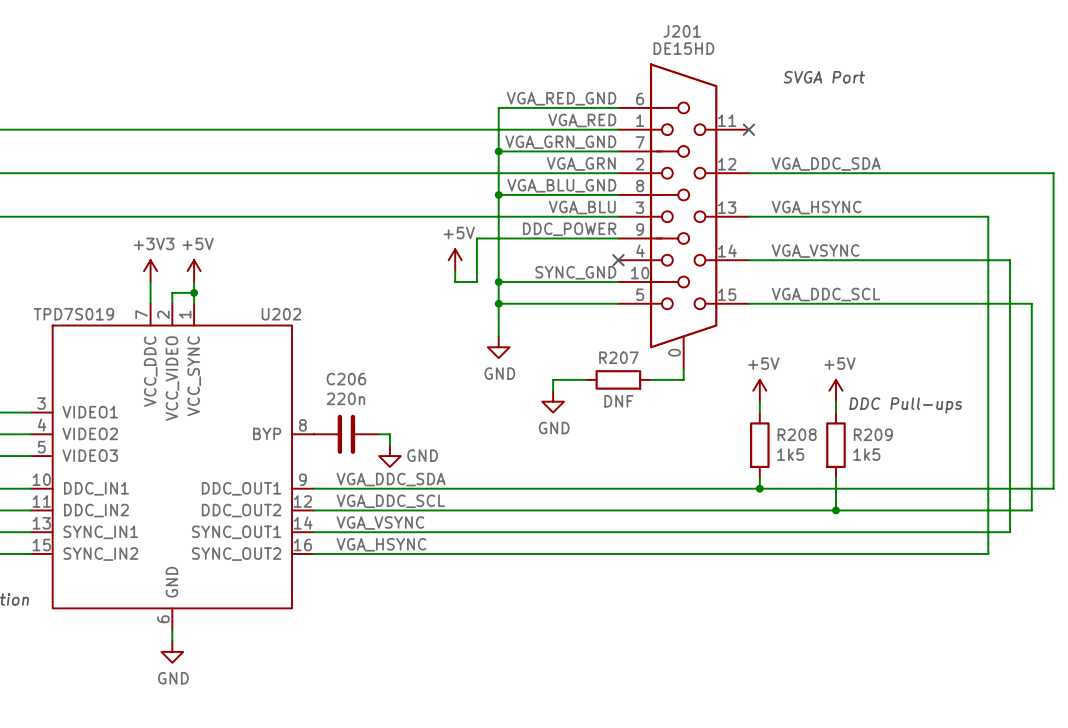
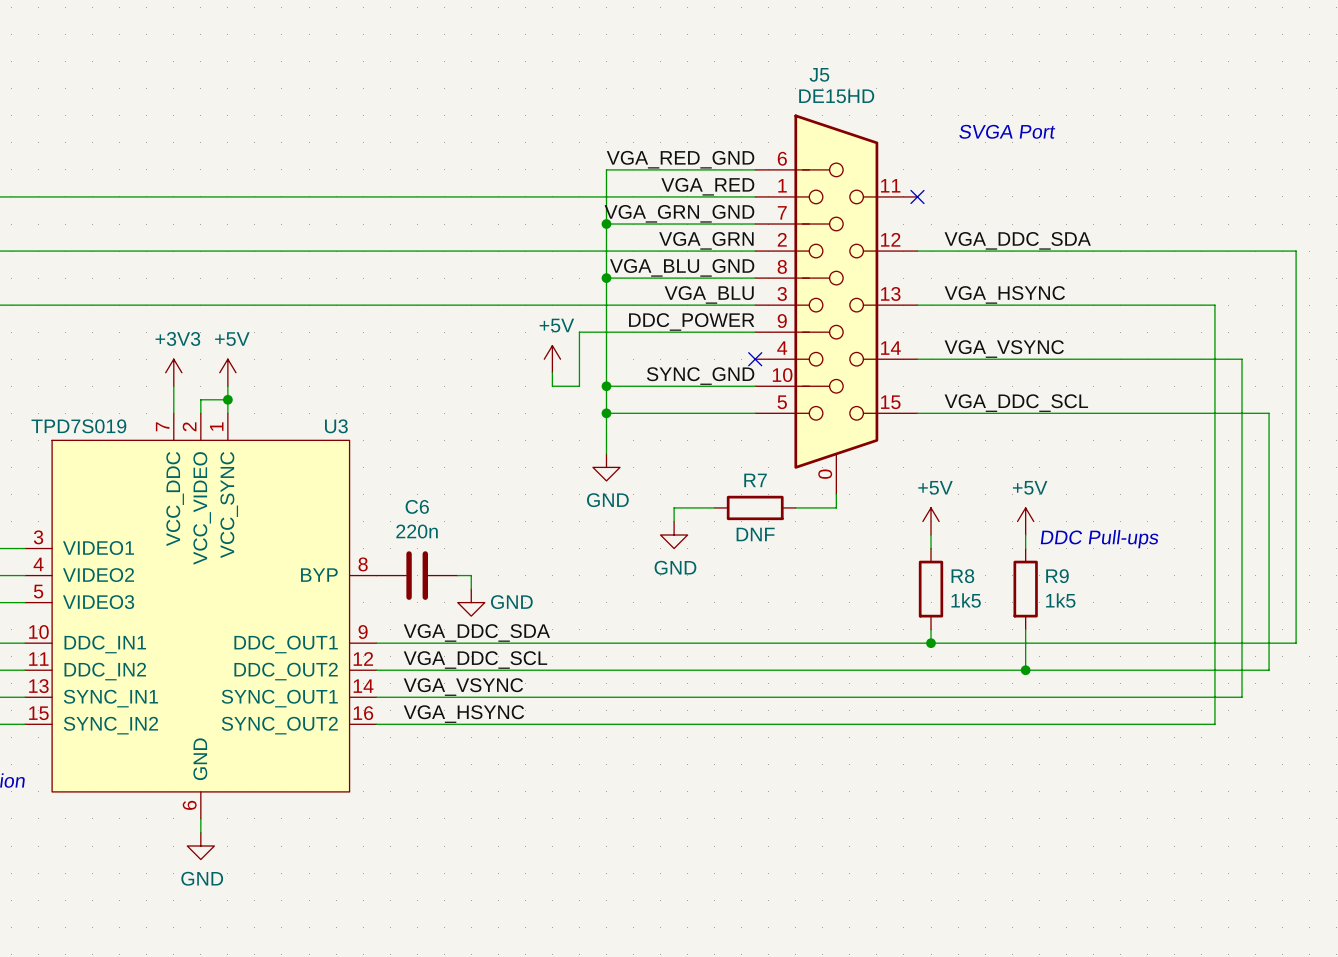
J201 name: J201 (682, 31) -> J5 (819, 74)
U202 name: U202 (281, 314) -> U3 (336, 426)
R207 name: R207 (618, 357) -> R7 (755, 480)
C206 name: C206 (346, 379) -> C6 (417, 506)
R208 name: R208 (797, 434) -> R8 (962, 576)
R209 name: R209 (873, 434) -> R9 (1057, 576)

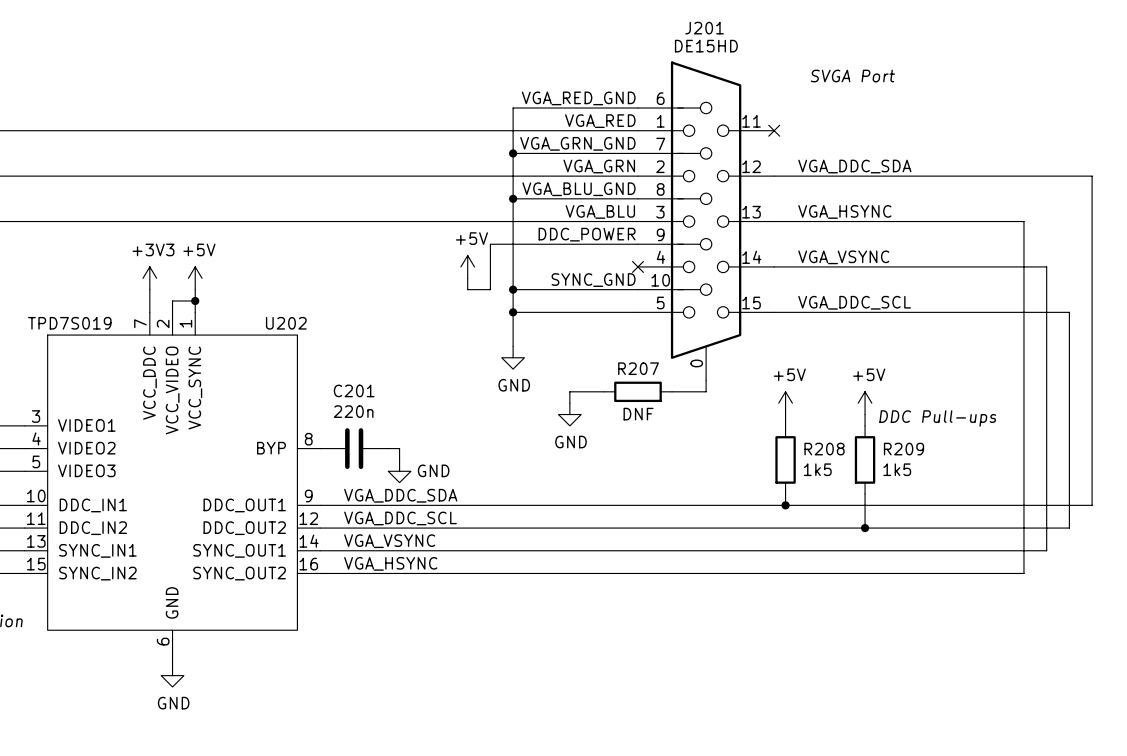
J5 name: J5 (819, 74) -> J201 (704, 28)
U3 name: U3 (336, 426) -> U202 (286, 323)
R7 name: R7 (755, 480) -> R207 (638, 368)
C6 name: C6 (417, 506) -> C201 (354, 390)
R8 name: R8 (962, 576) -> R208 (824, 449)
R9 name: R9 (1057, 576) -> R209 (903, 449)

